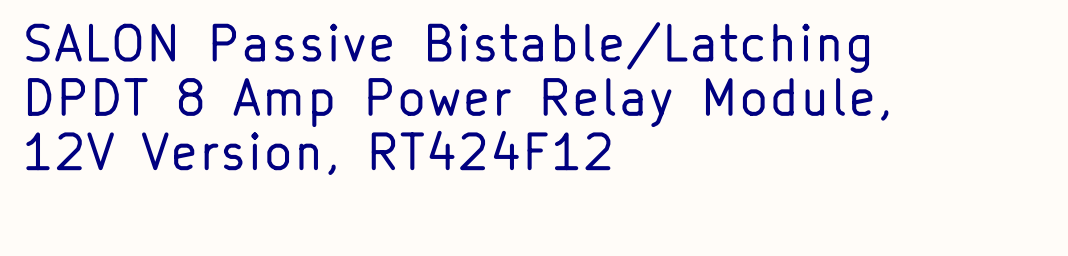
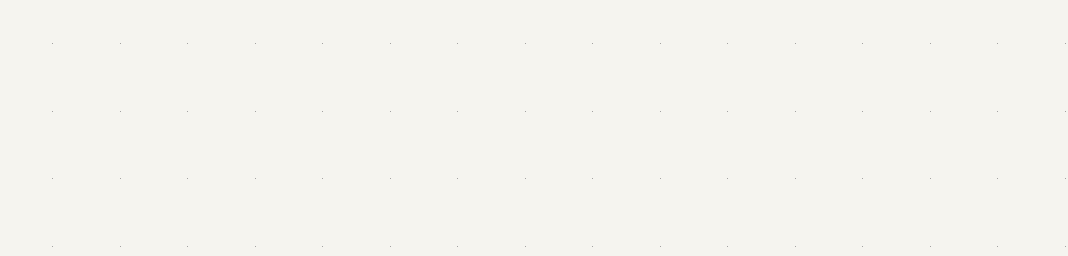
text: SALON Passive Bistable/Latching (447, 47) -> none
text: DPDT 8 Amp Power Relay Module, (458, 102) -> none
text: 12V Version, RT424F12 (318, 152) -> none

